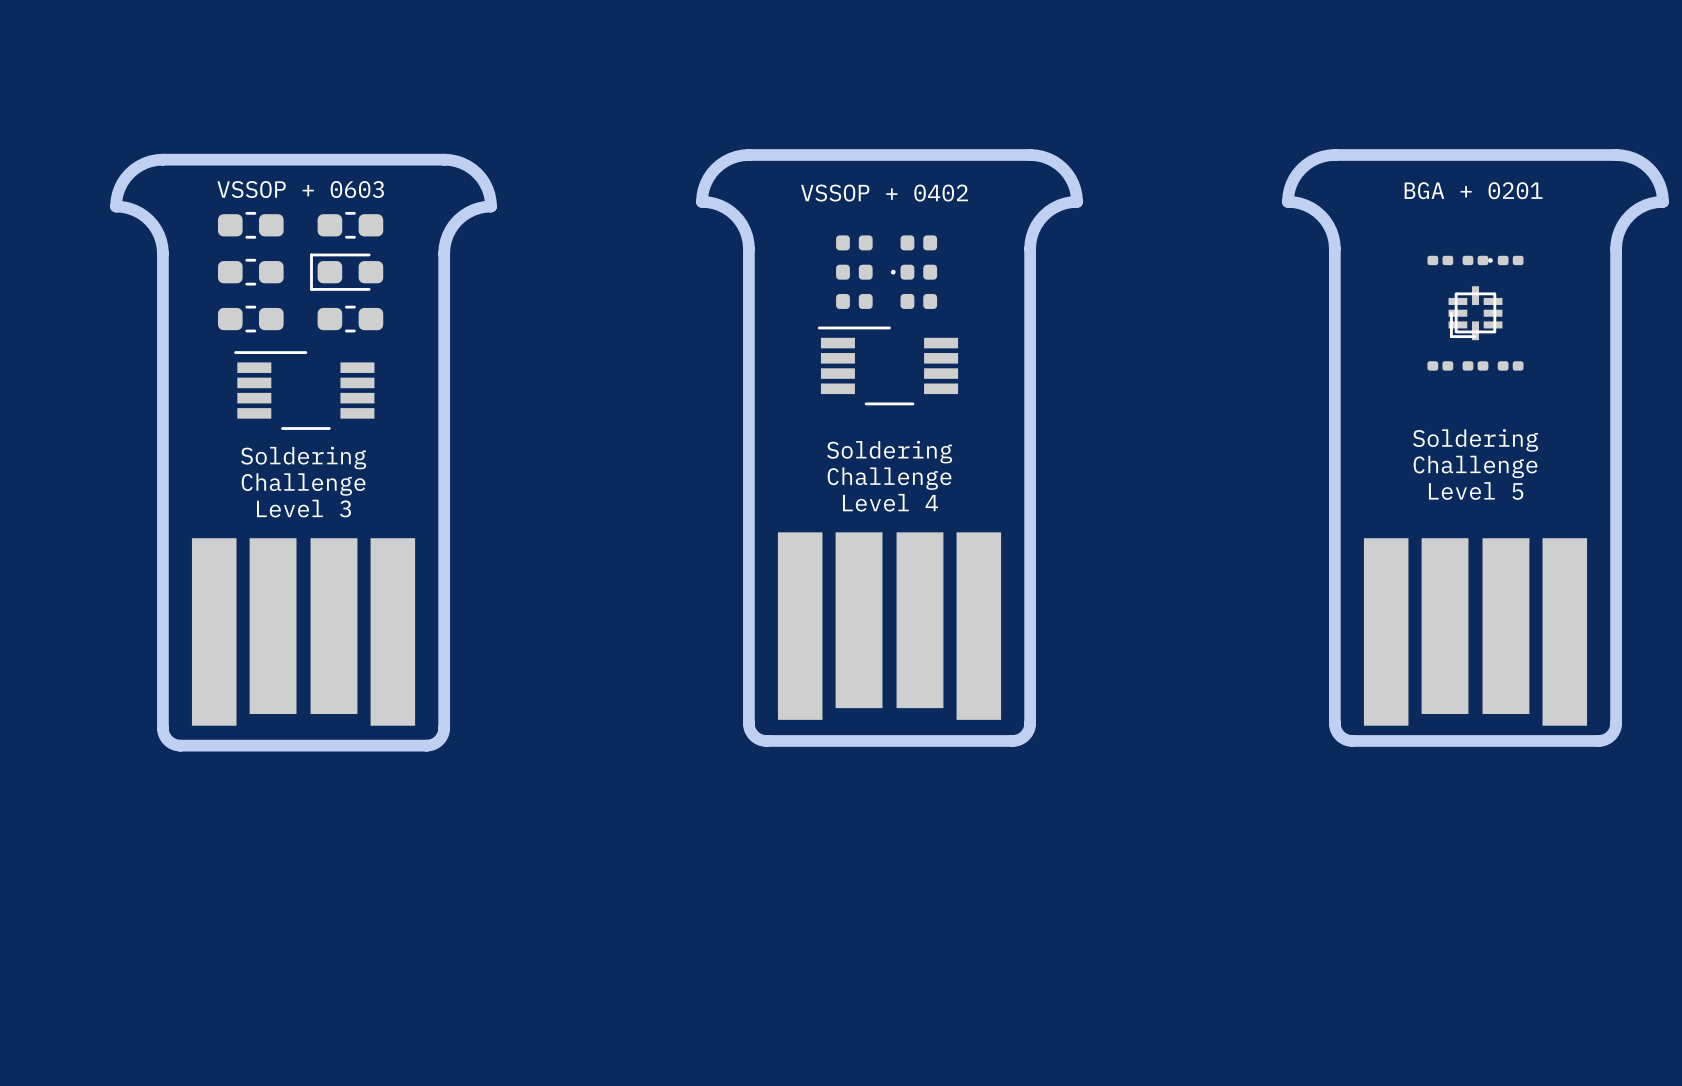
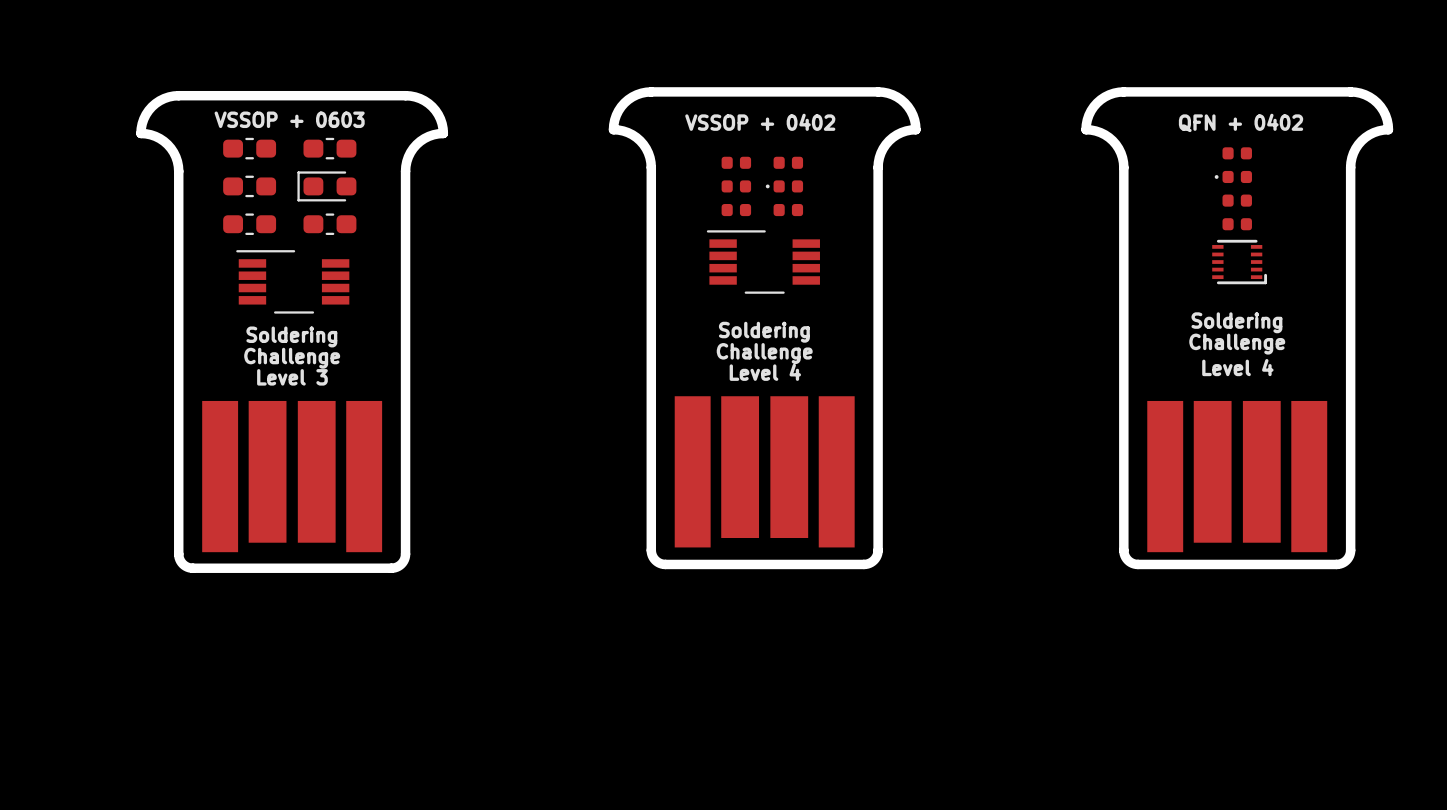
text: BGA + 0201 (1473, 190) -> QFN + 0402 (1241, 122)
part: none -> (1237, 153)
part footprint: [1462, 255, 1489, 266] -> [1214, 170, 1252, 184]
part: (1440, 260) -> none
part: (1505, 260) -> none
part footprint: [1448, 286, 1503, 341] -> [1222, 218, 1252, 231]
part: none -> (1237, 200)
part footprint: [1462, 361, 1489, 371] -> [1212, 239, 1268, 285]
part: (1440, 365) -> none
part: (1510, 365) -> none
text: Level 5 (1476, 491) -> Level 4 (1237, 367)

